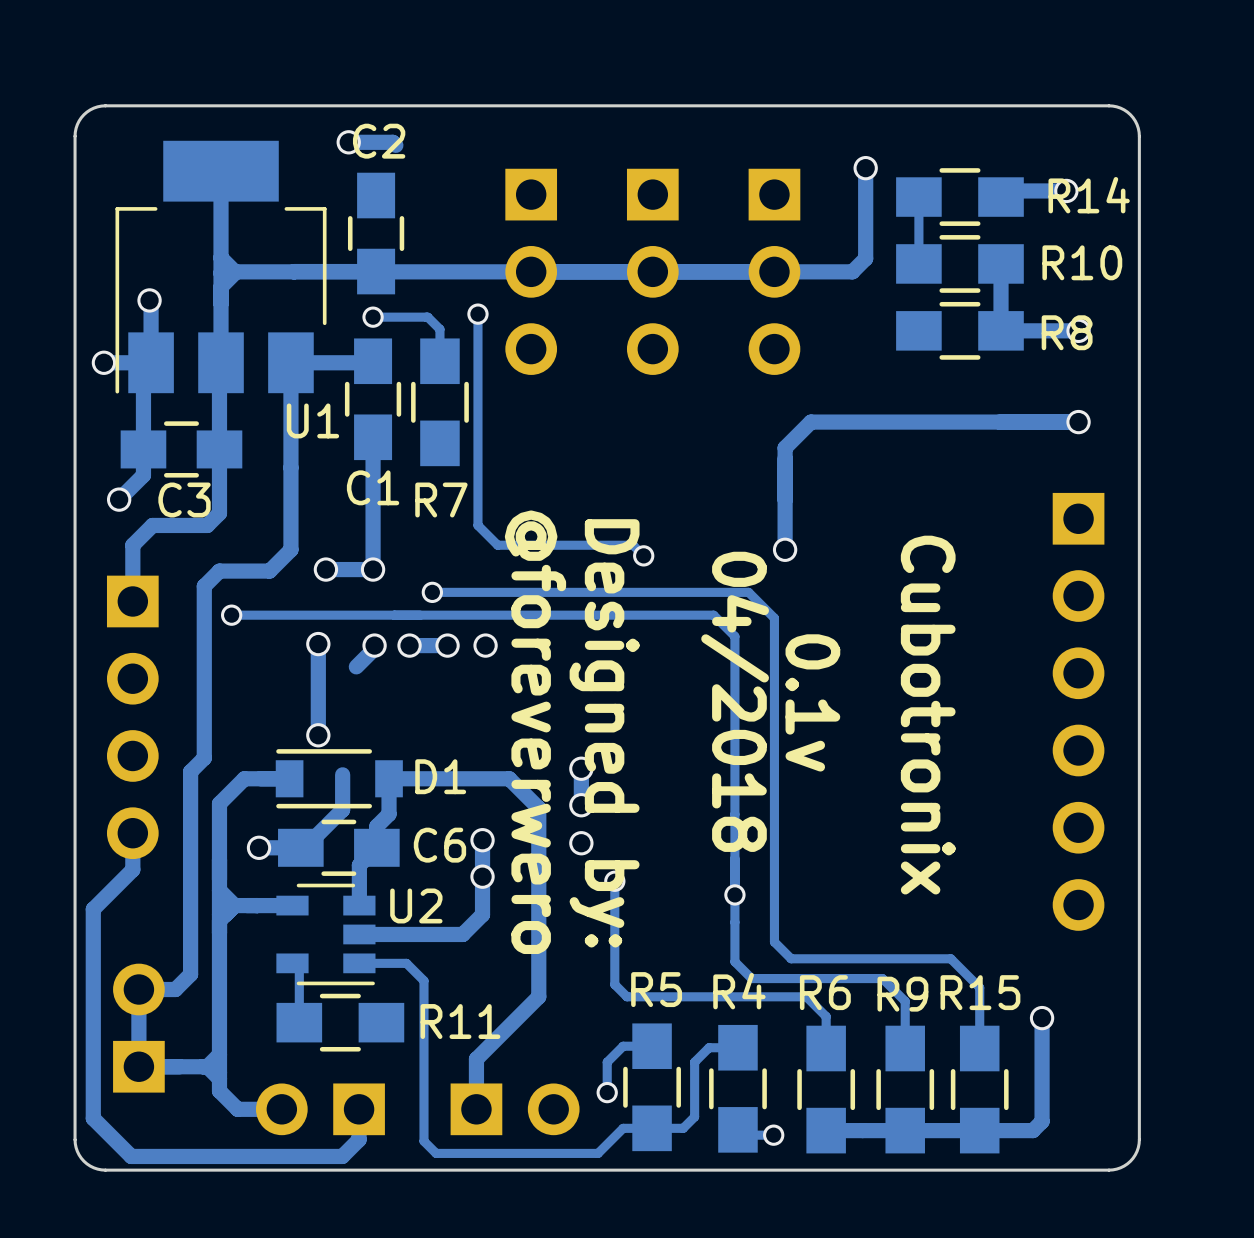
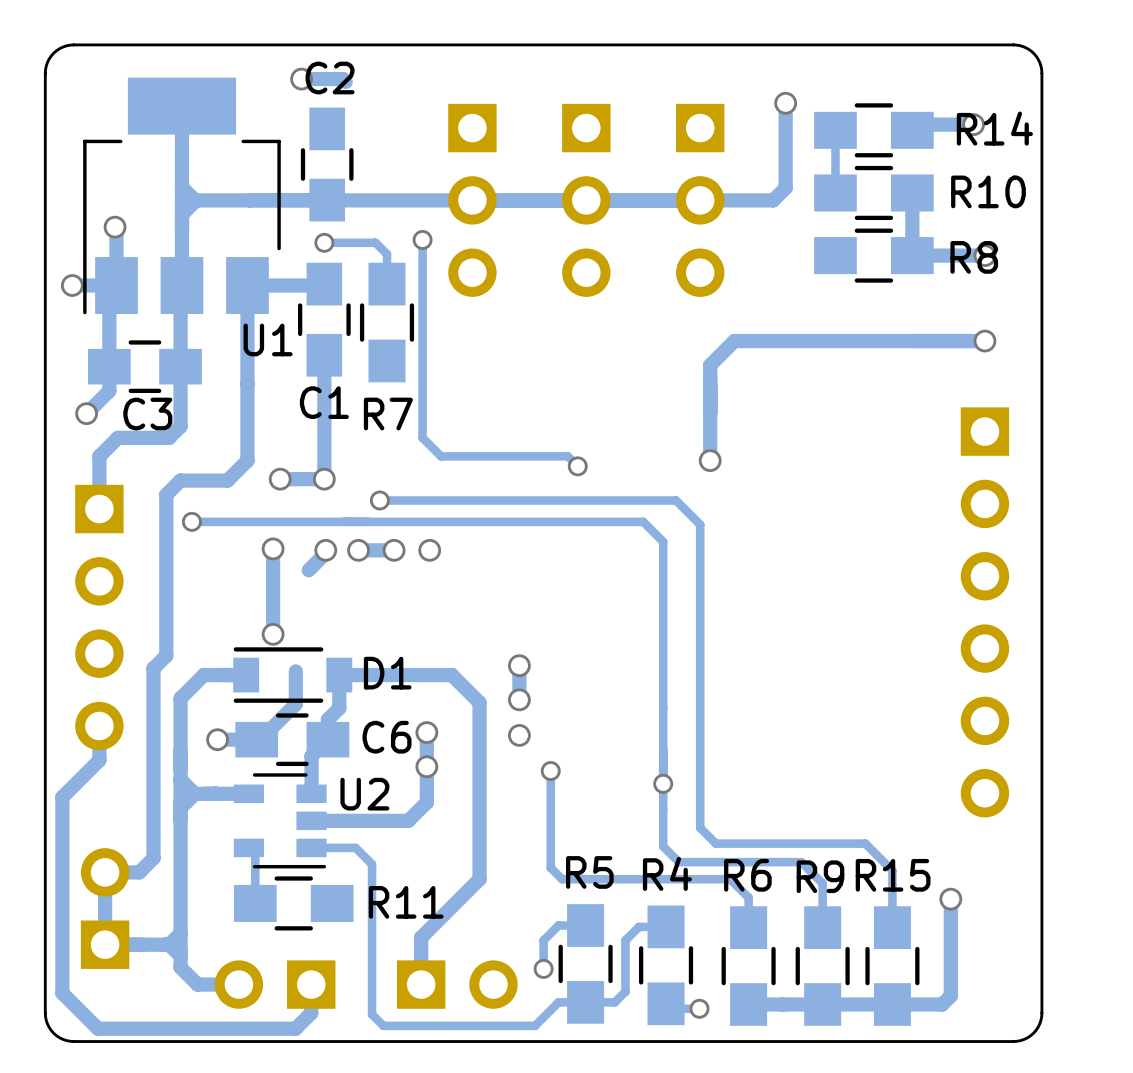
text: 04/2018 (735, 701) -> none
text: 0.1v (812, 702) -> none
text: Cubotronix (928, 715) -> none
text: @foreverwero (535, 732) -> none
text: Designed by: (604, 733) -> none

